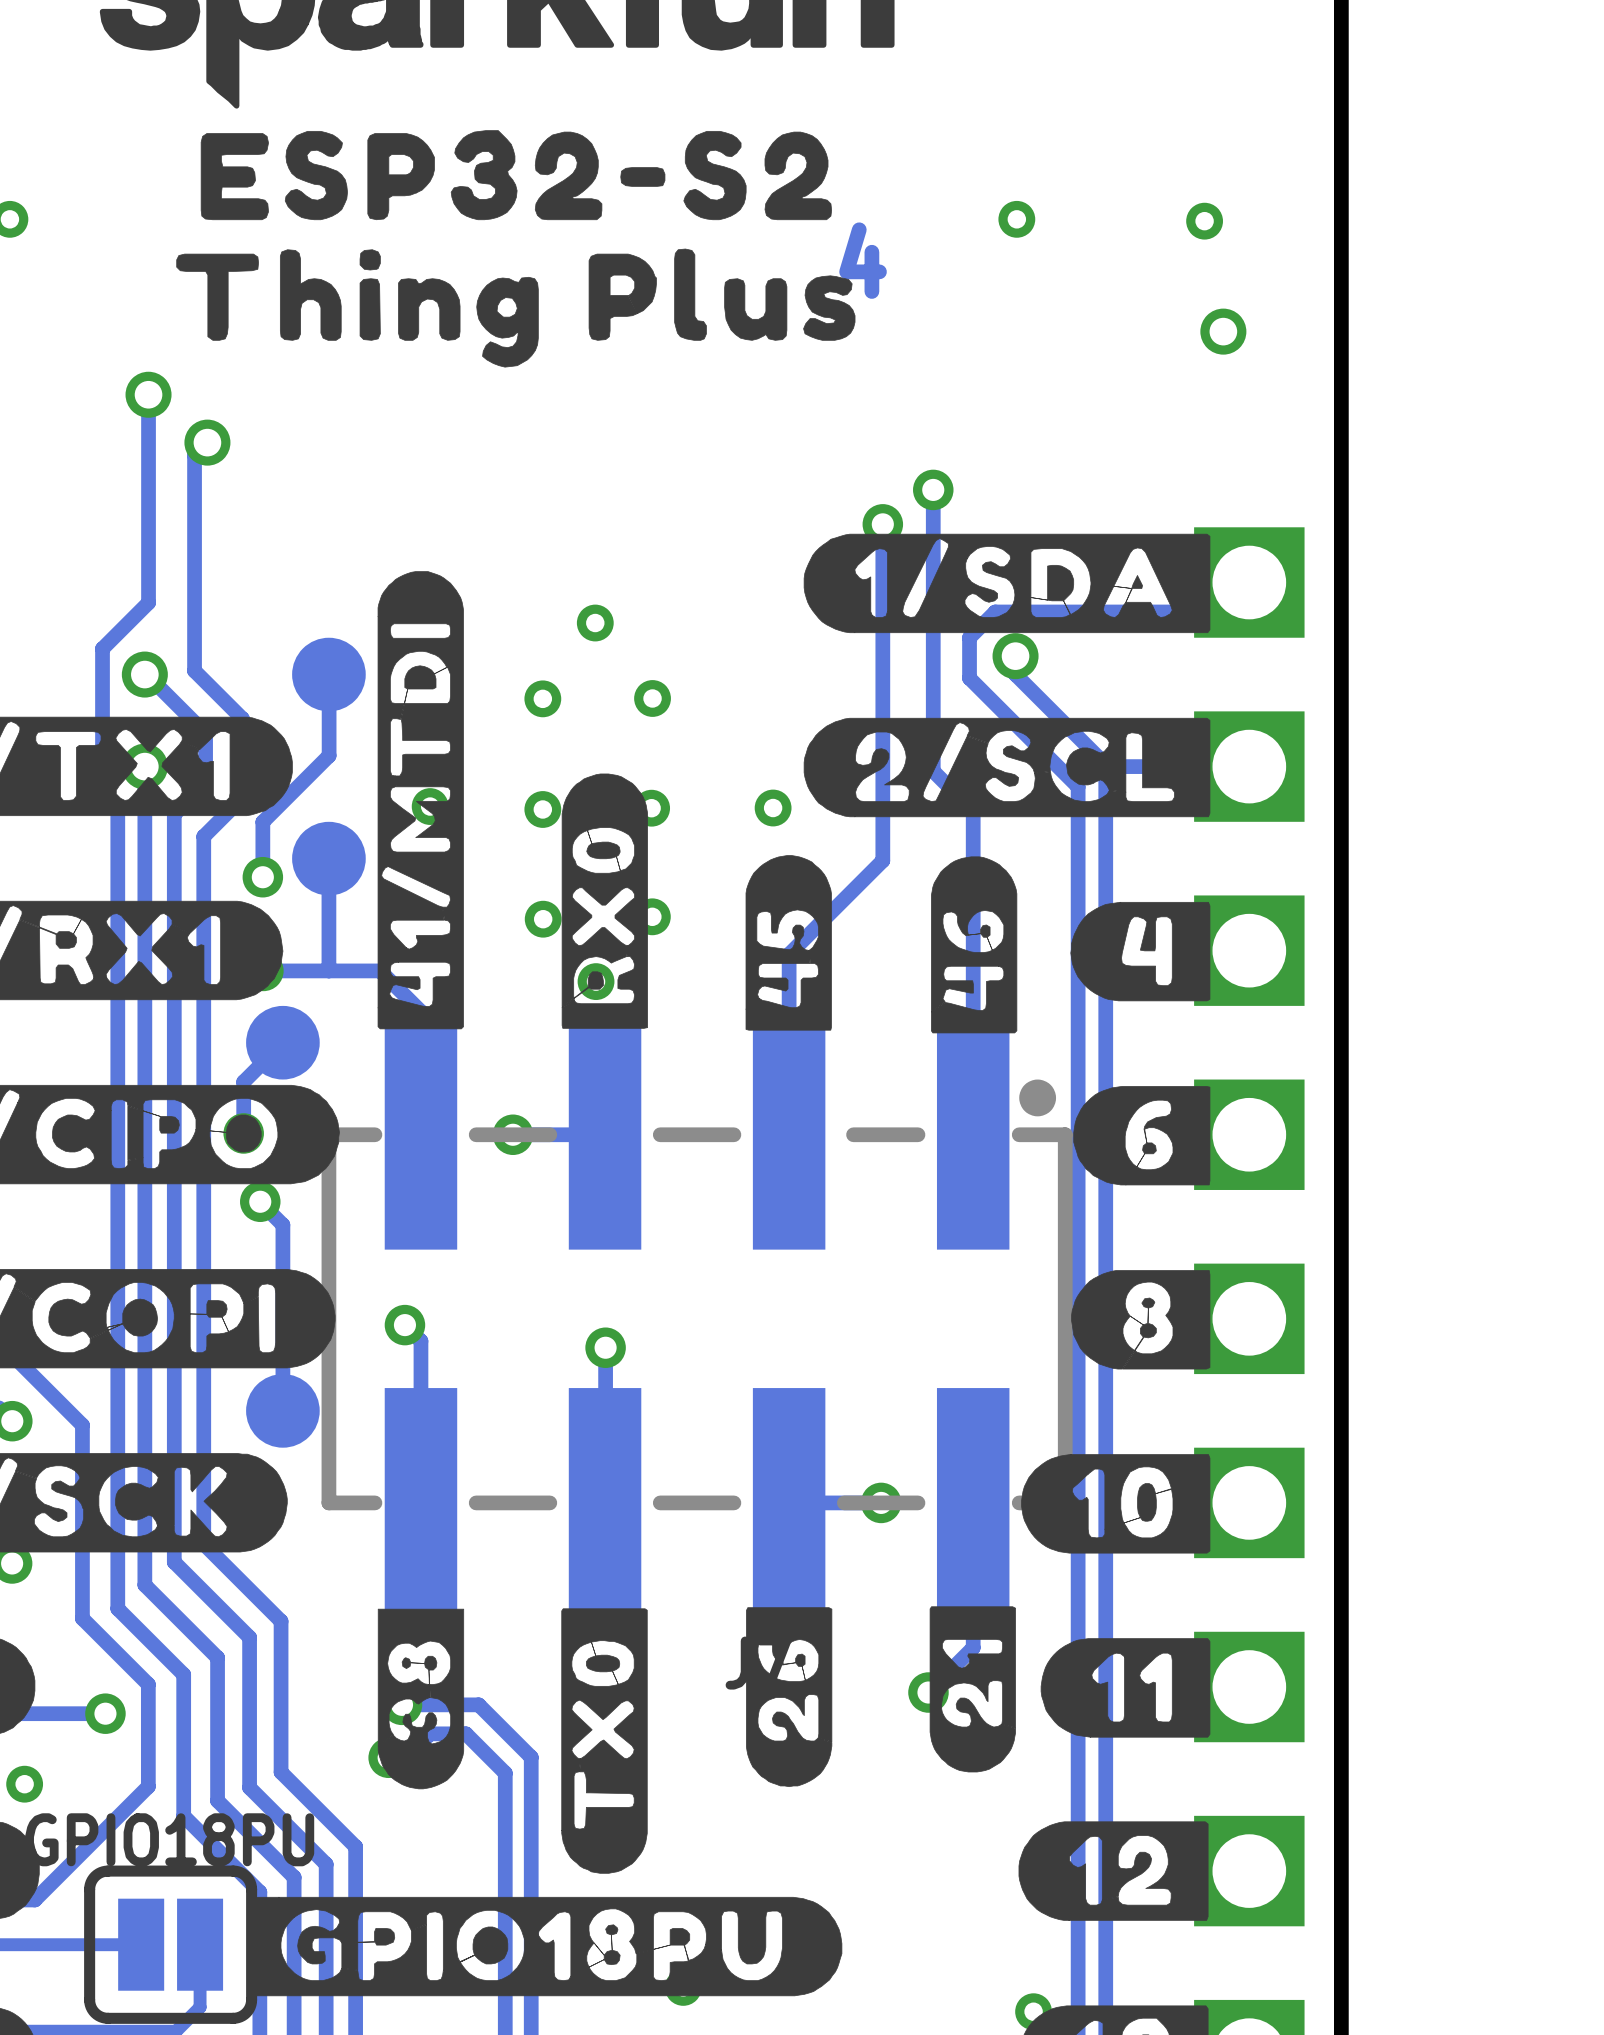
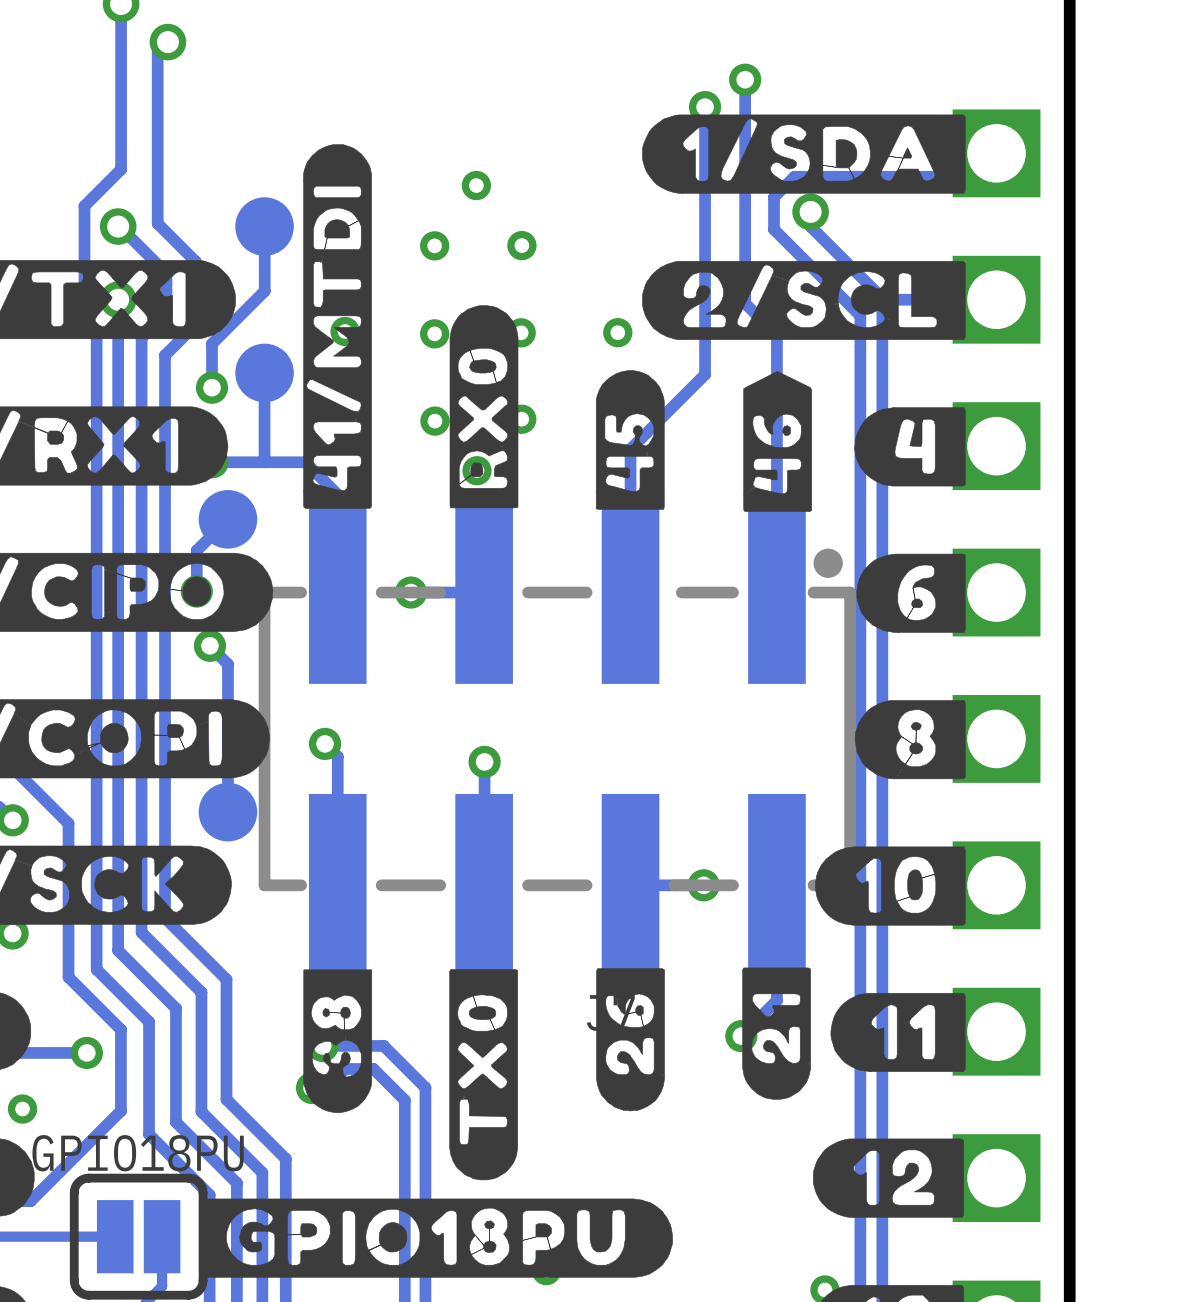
drawing shape: [931, 856, 1018, 1034] -> [743, 371, 812, 512]

